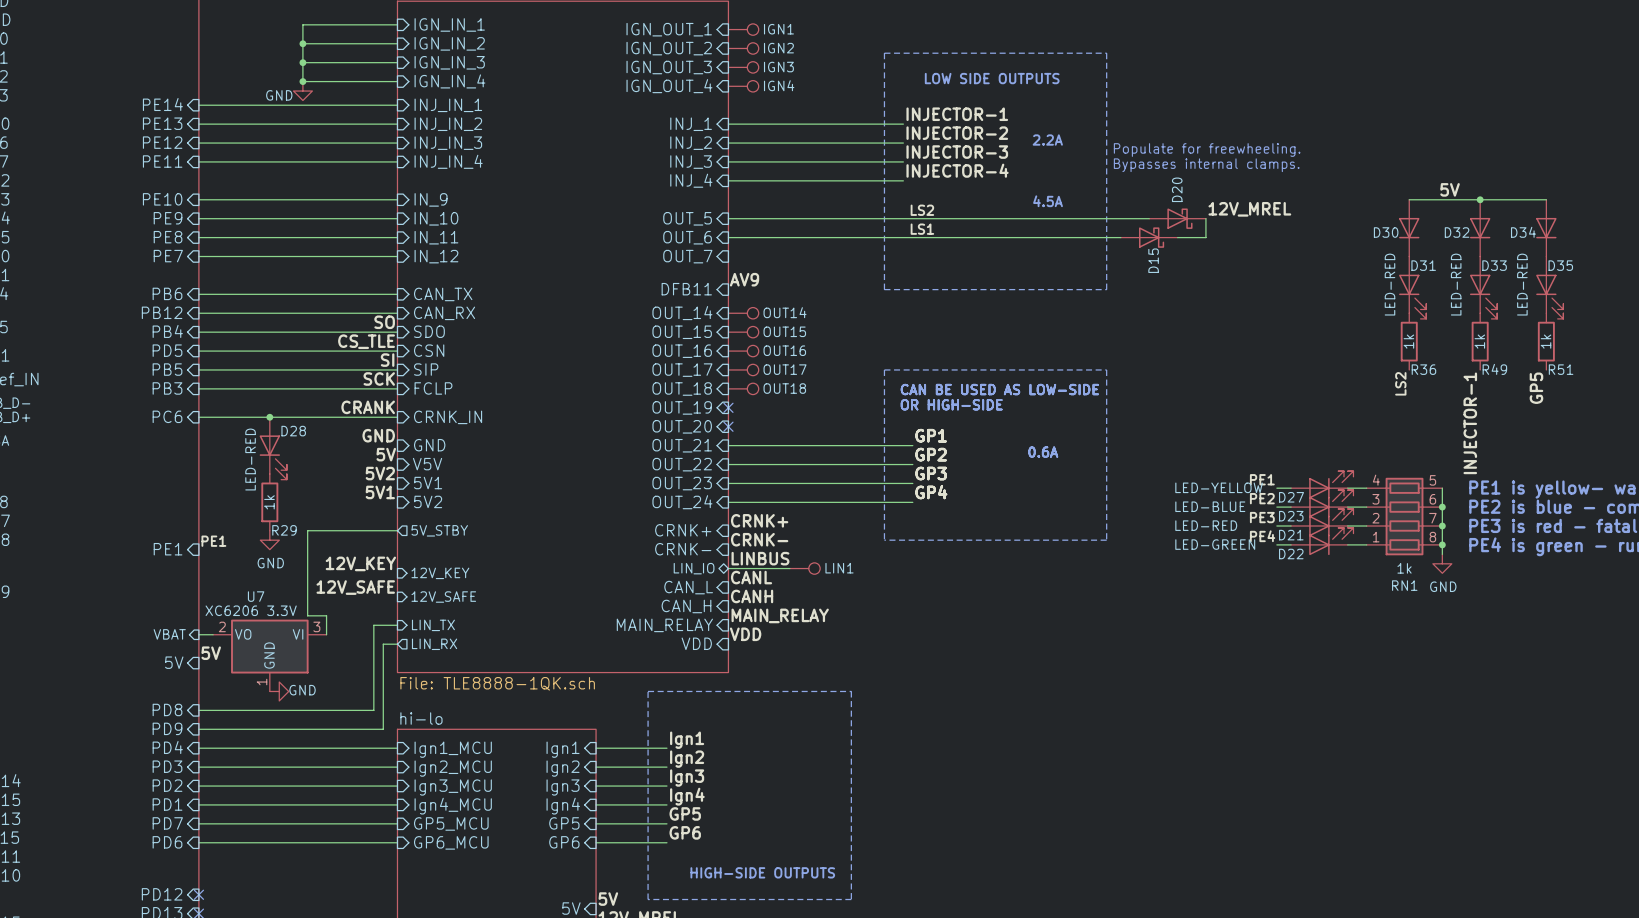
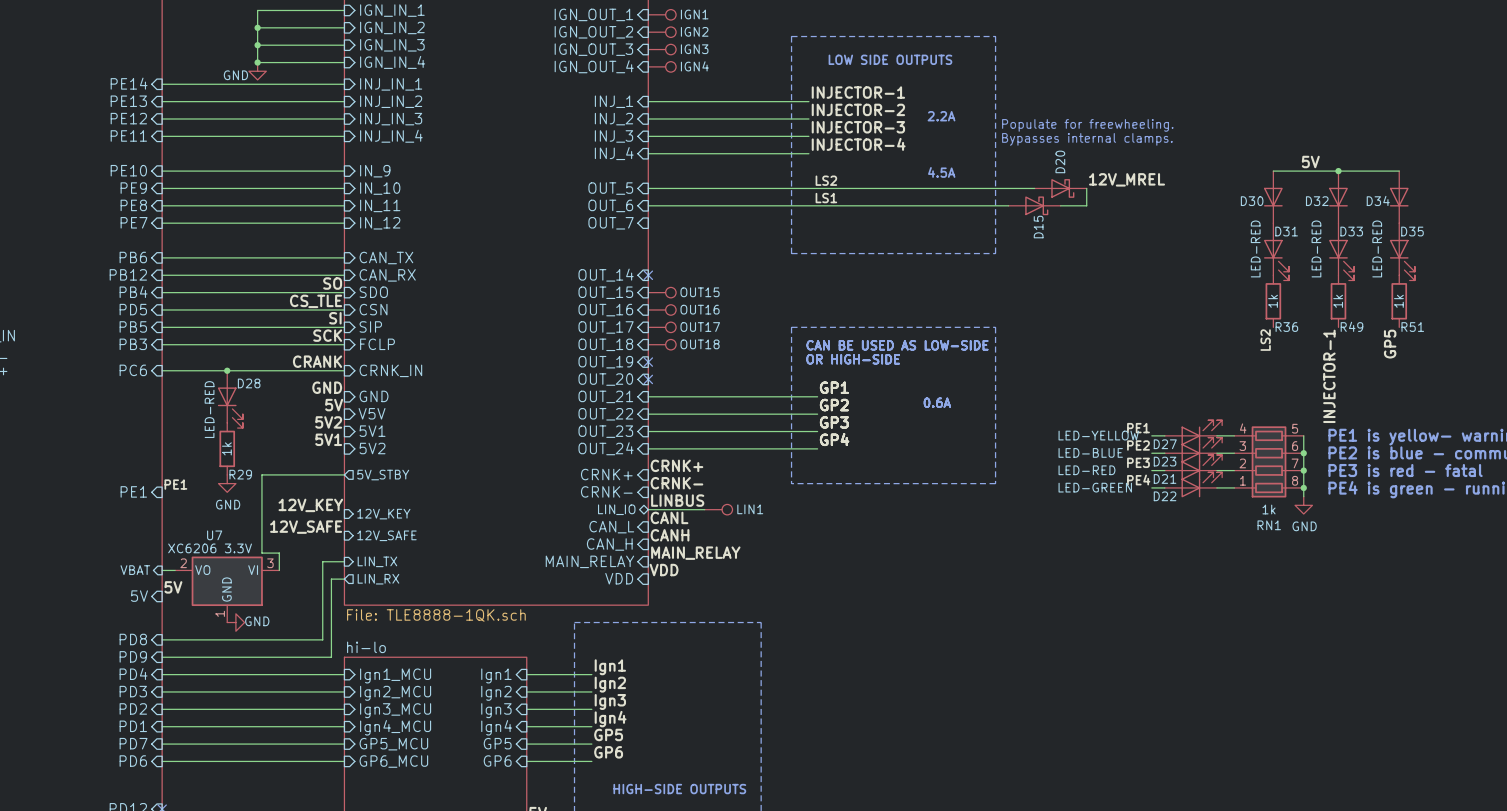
label: AV9 (744, 279) -> none
sheet pin: DFB11 (686, 289) -> none
no-connect mark: none -> (648, 275)
OUT14: (743, 313) -> none

